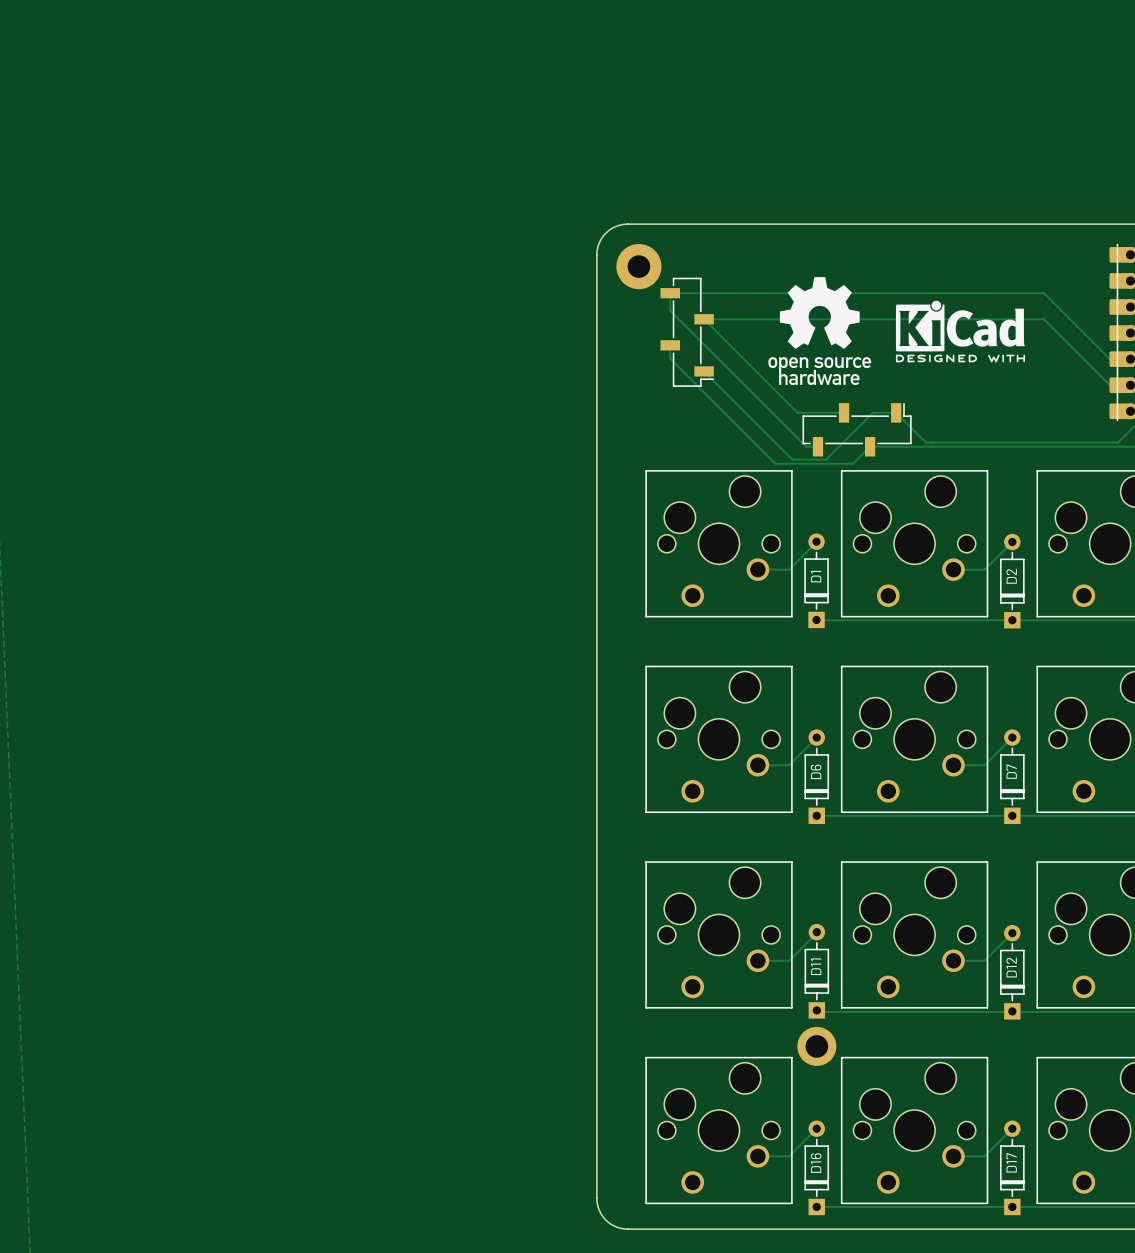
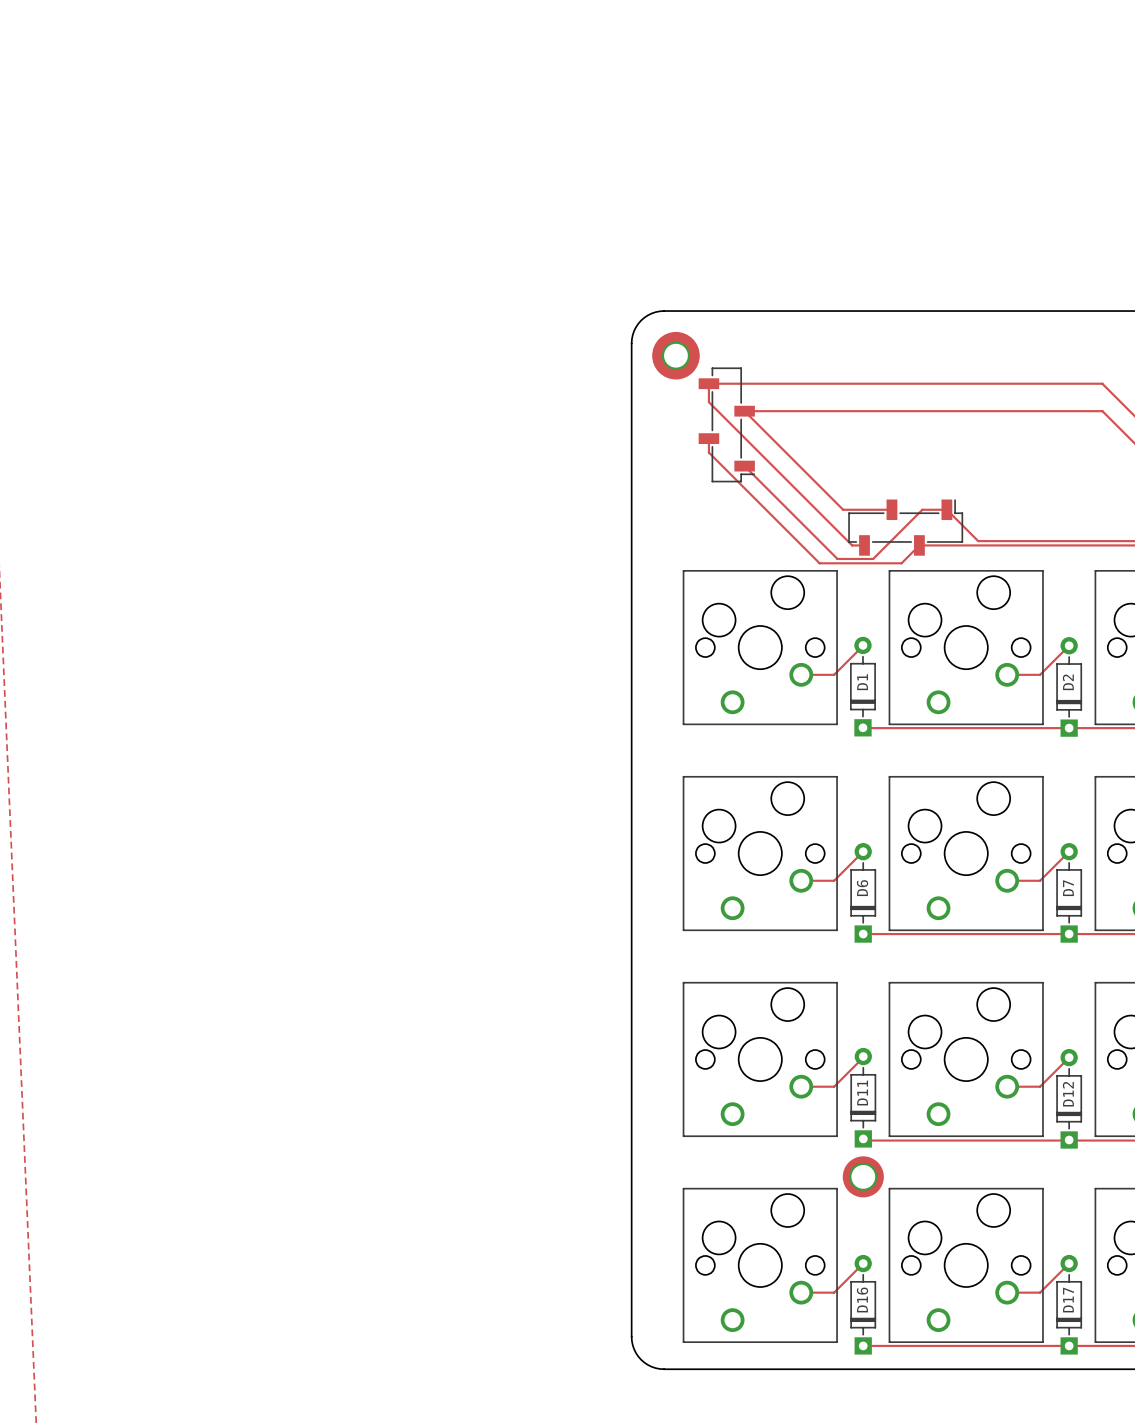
drawing: [768, 277, 872, 385] -> none
drawing: [895, 300, 1026, 363] -> none

